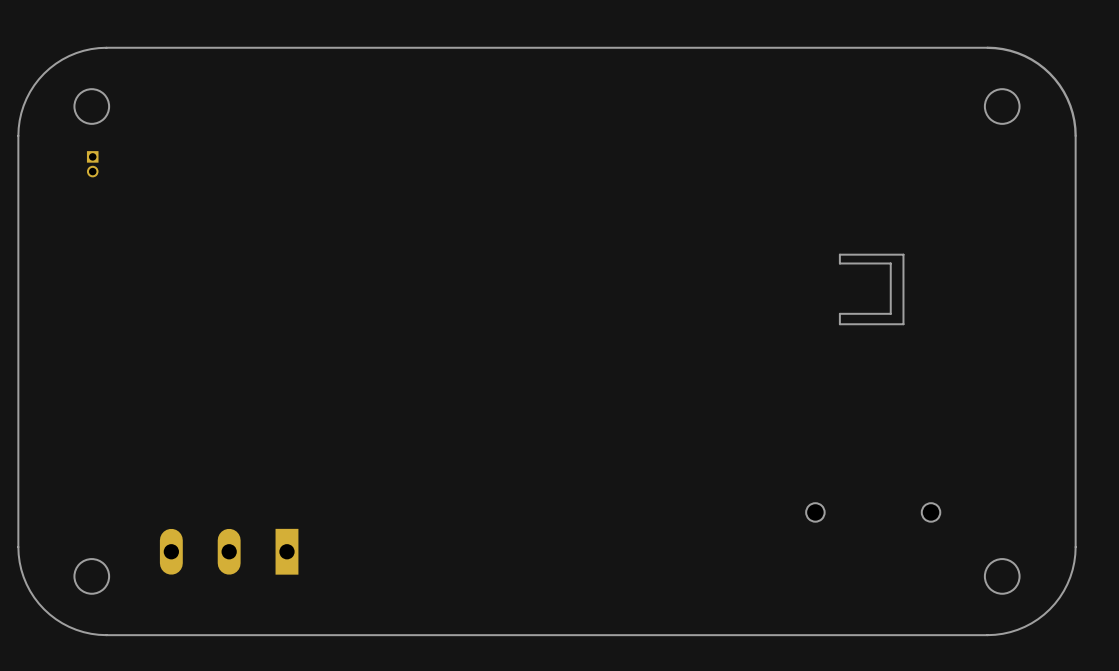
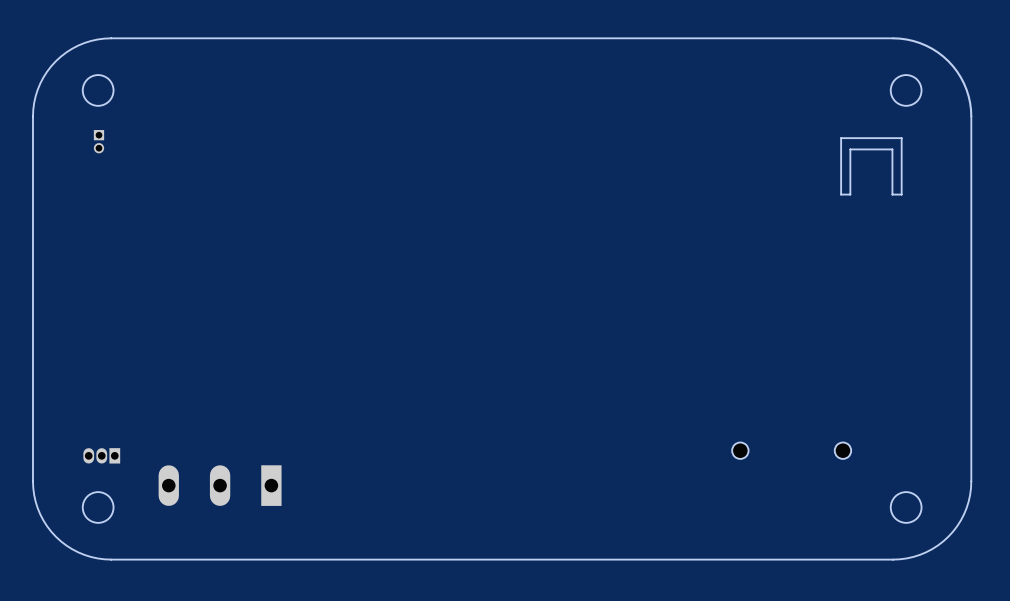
board edge: none -> (901, 138) (901, 194) (892, 194) (892, 149) (850, 149) (850, 194) (841, 194) (841, 138) (901, 138)
board edge: (903, 254) (903, 324) (839, 324) (839, 313) (890, 313) (890, 263) (839, 263) (839, 254) (903, 254) -> none
part: none -> (101, 455)

